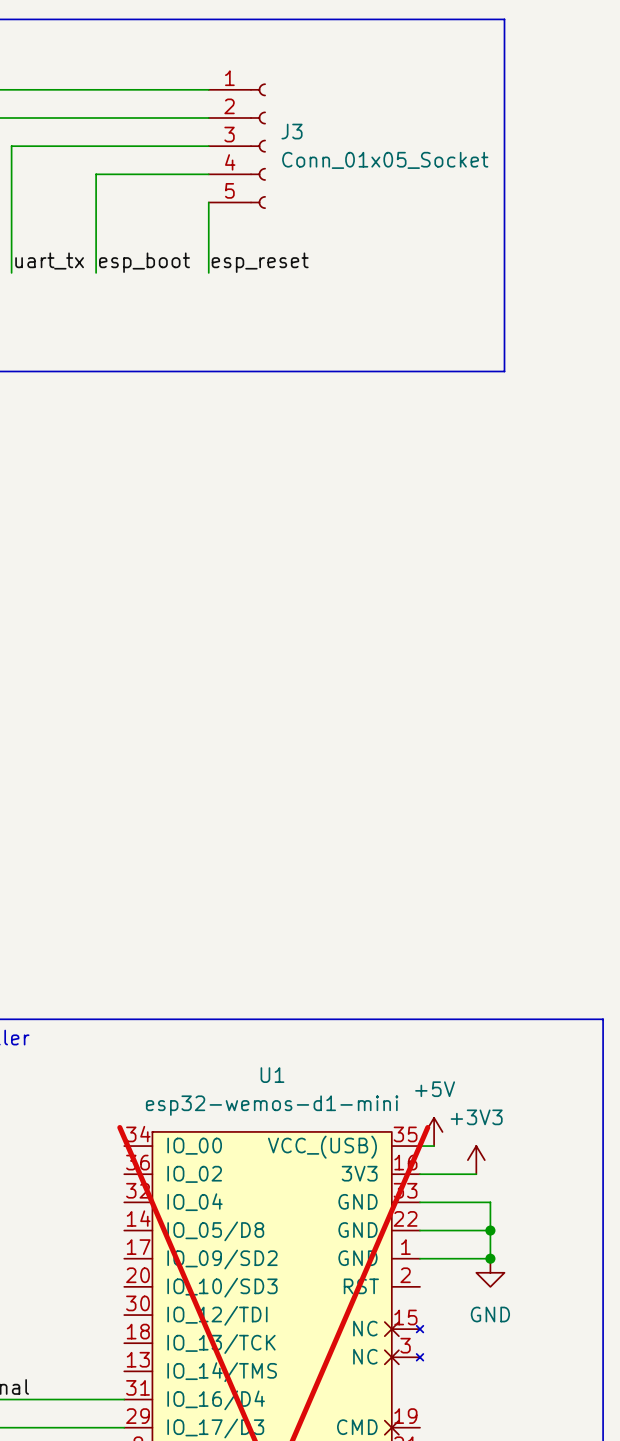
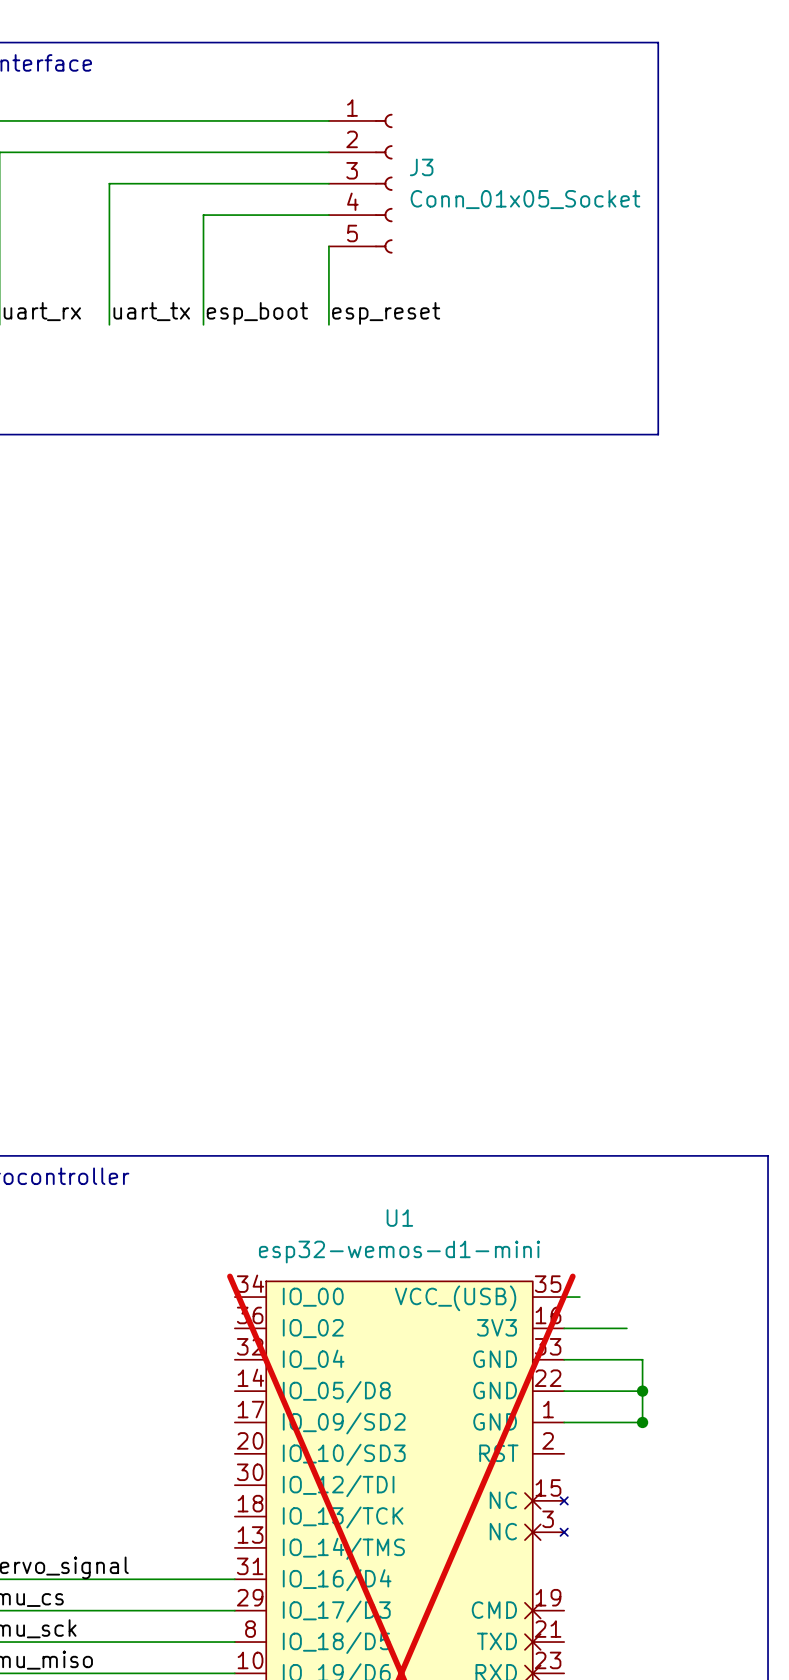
power symbol: +5V (434, 1131) -> none
power symbol: +3V3 (476, 1160) -> none
power symbol: GND (490, 1272) -> none

